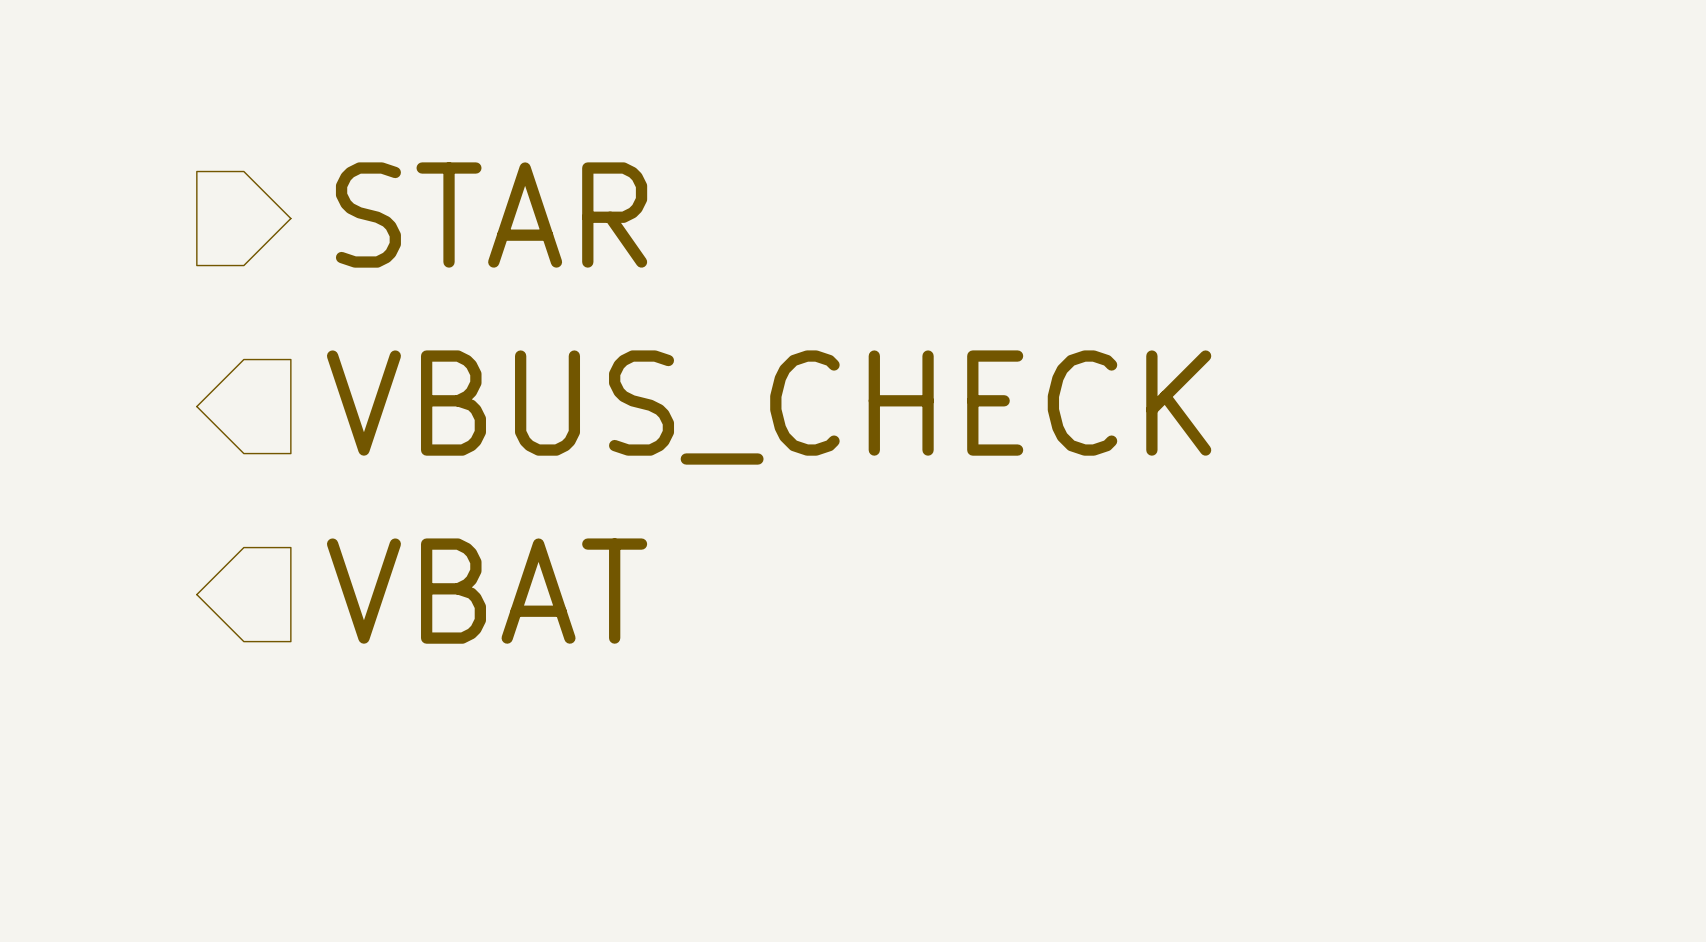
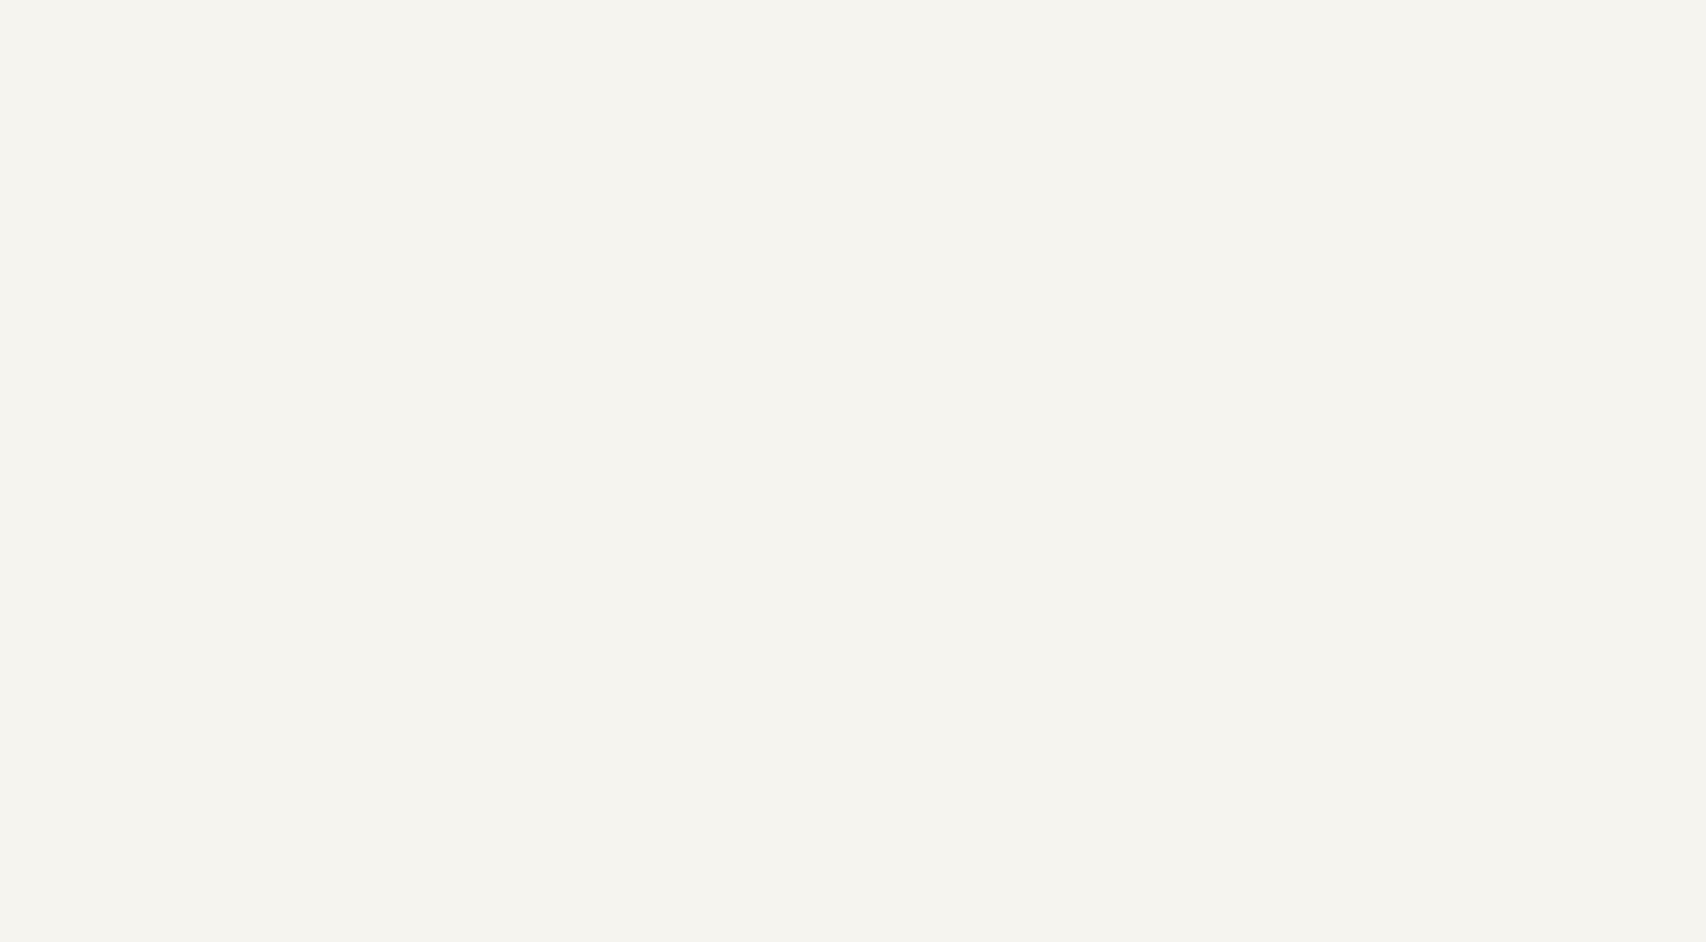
hierarchical label: STAR (491, 215) -> none
hierarchical label: VBUS_CHECK (769, 407) -> none
hierarchical label: VBAT (487, 591) -> none

